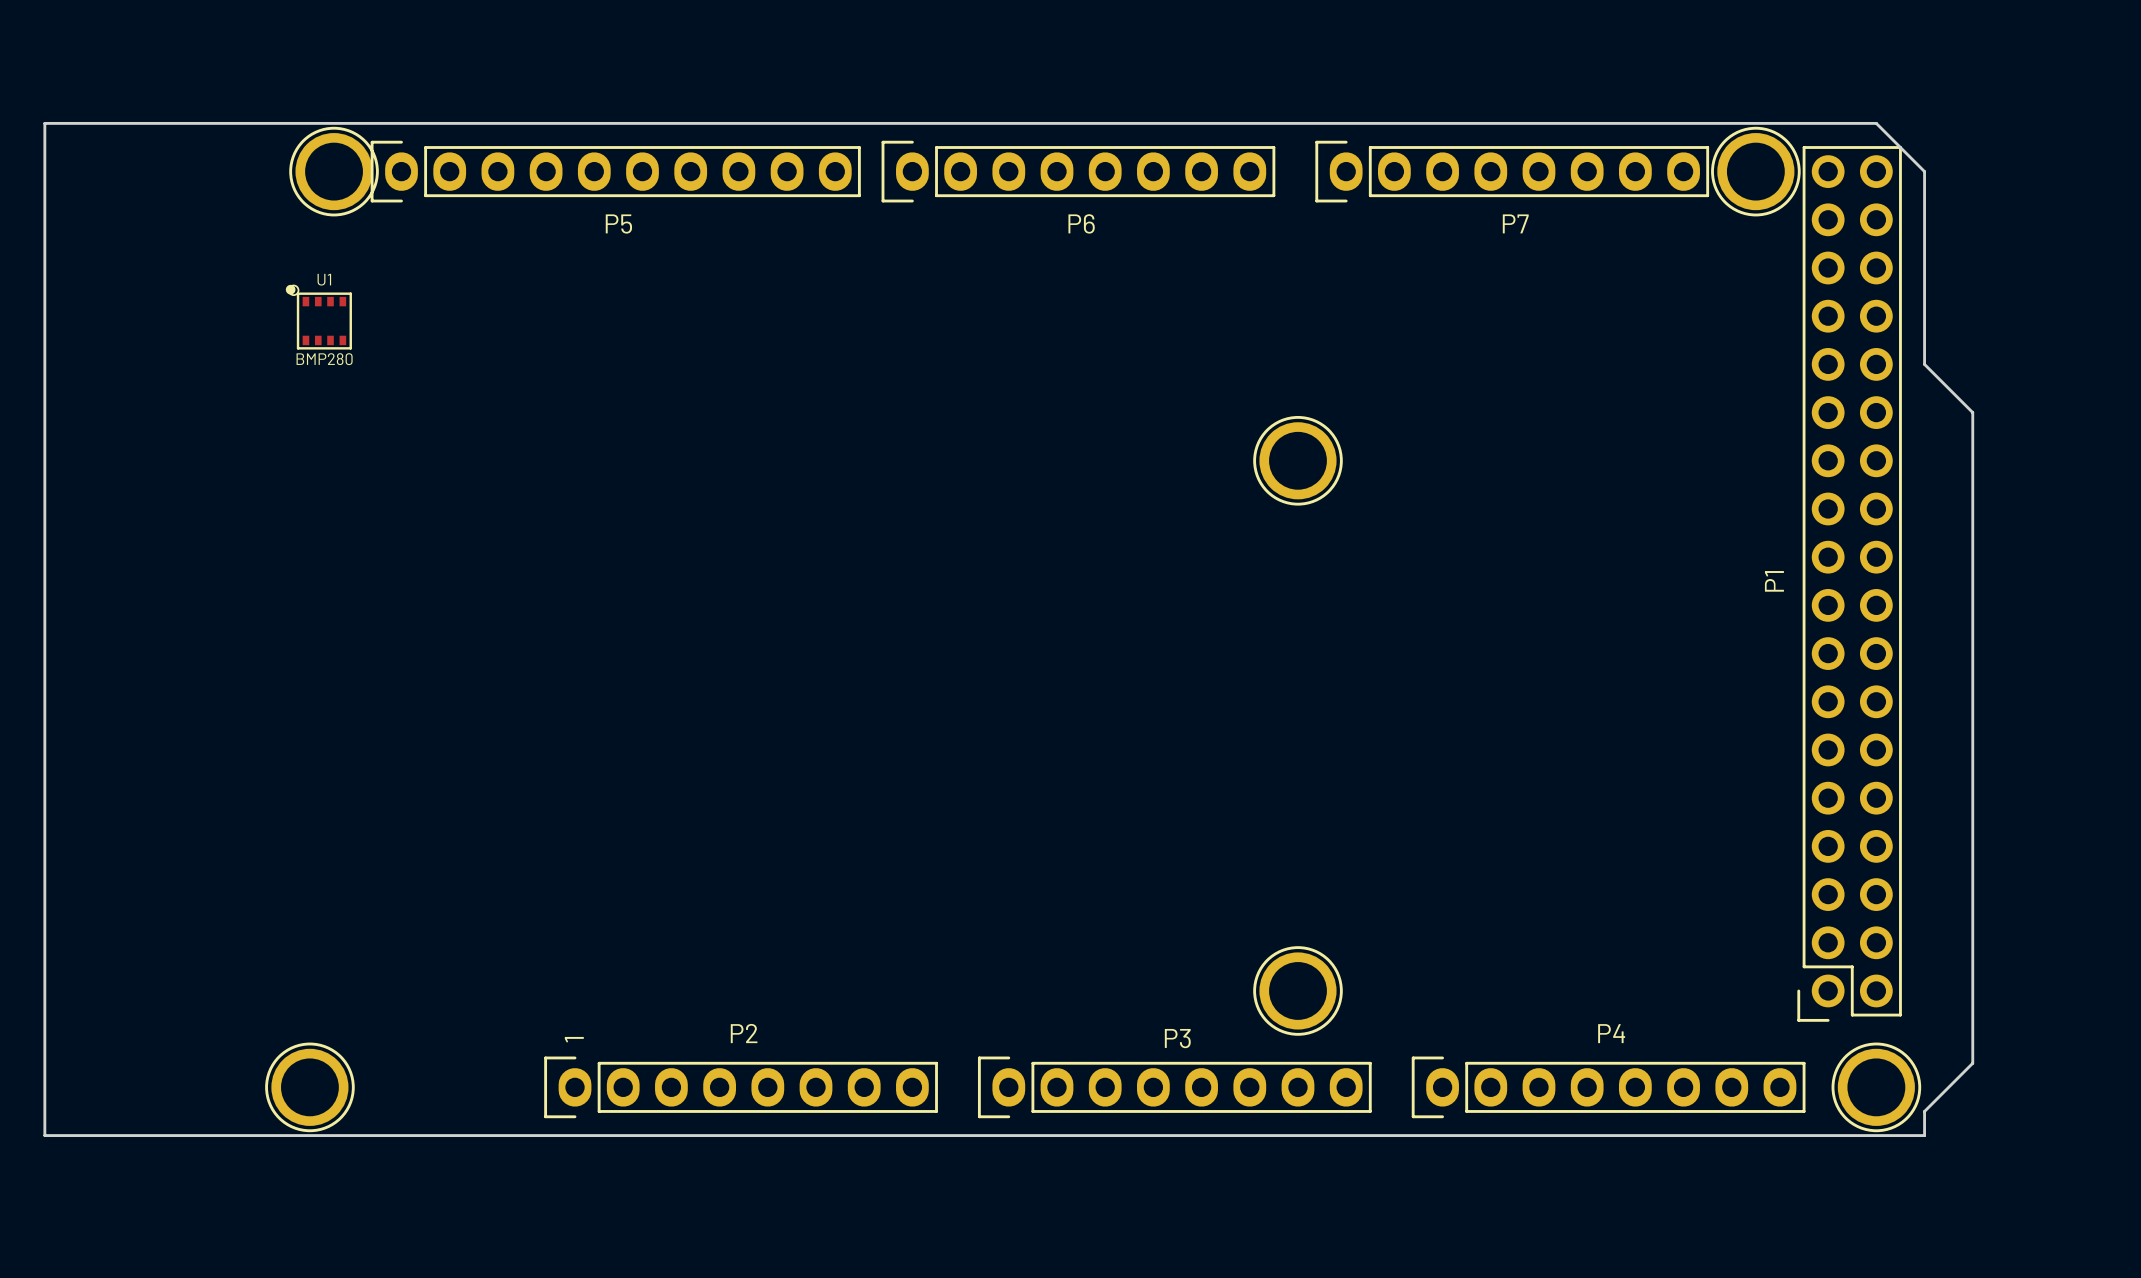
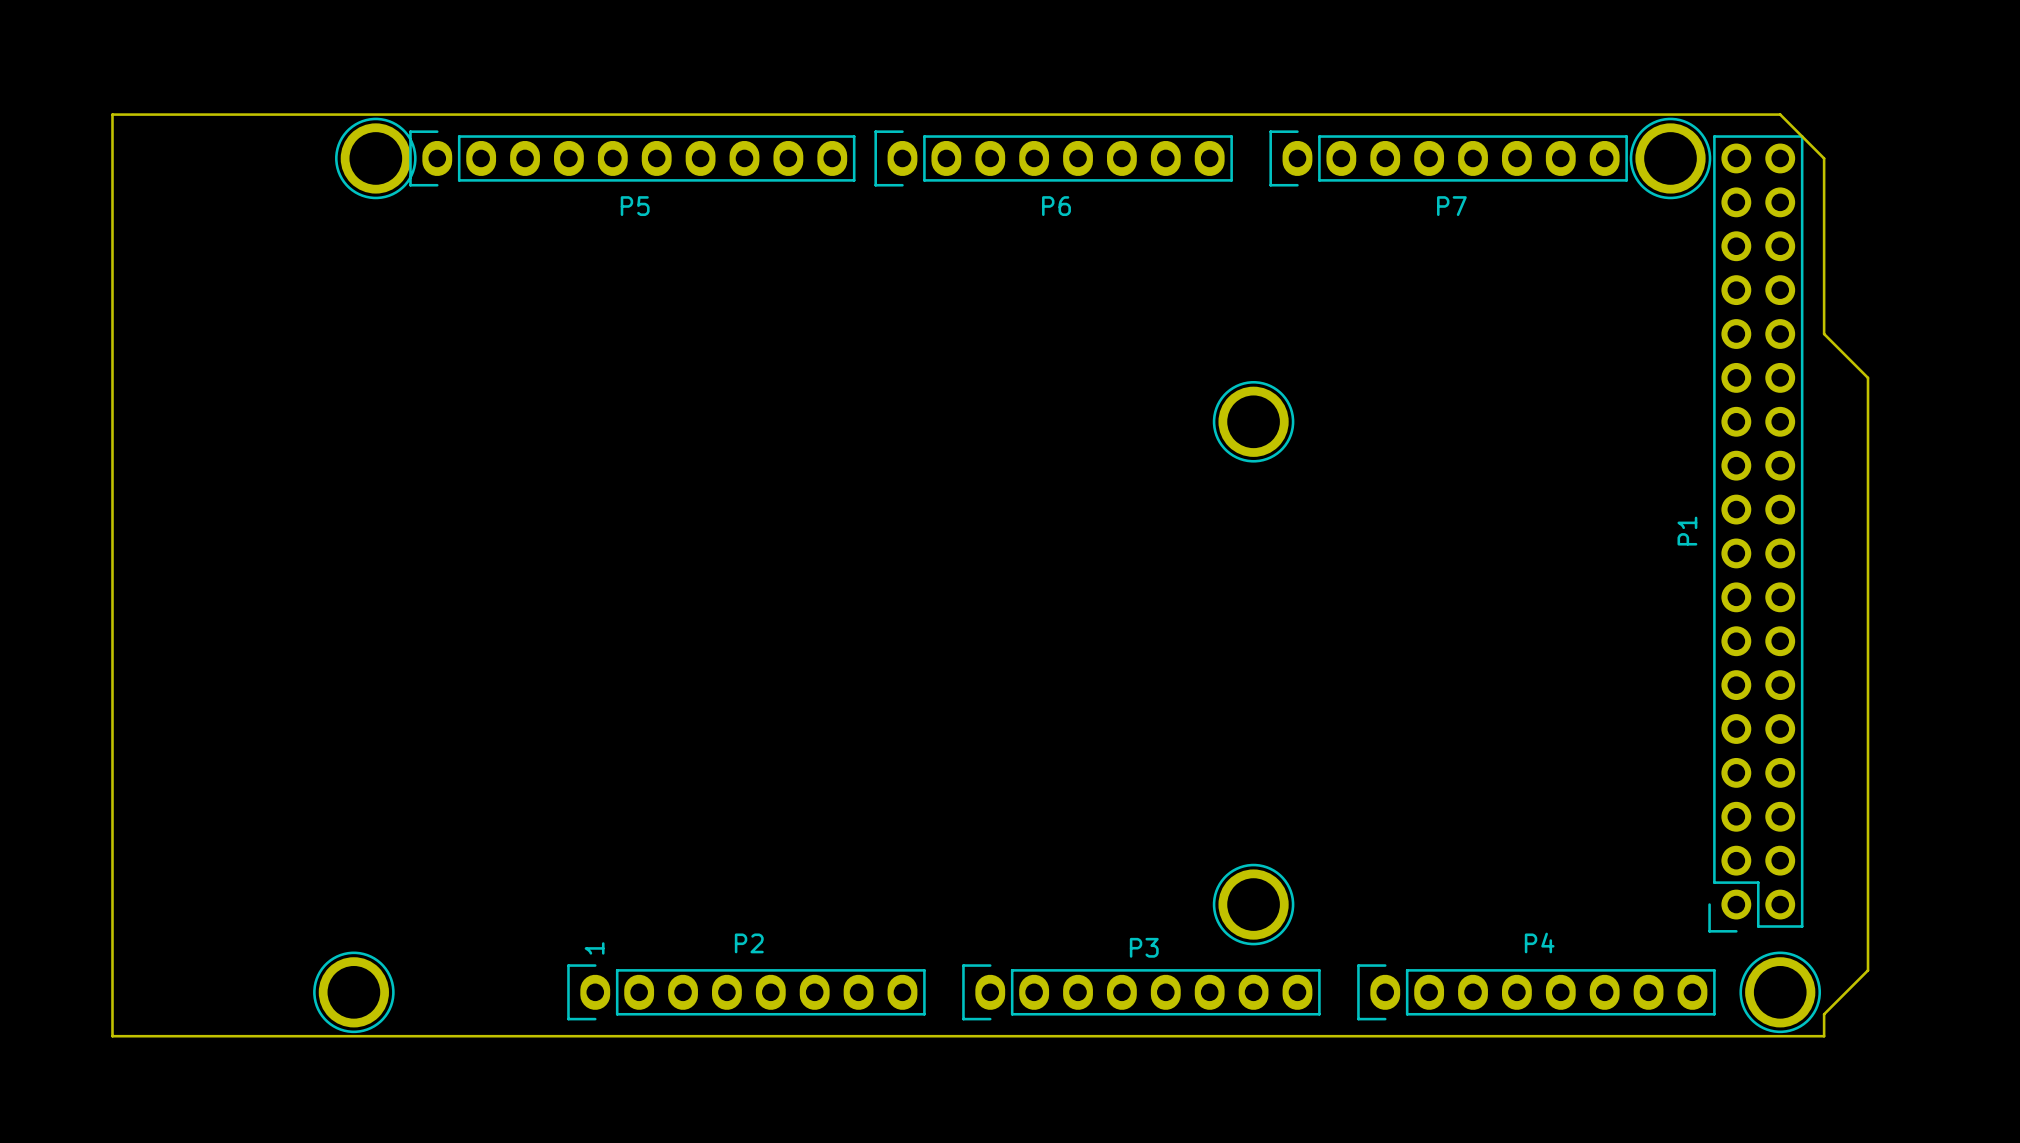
U1: BMP280 (318, 317) -> none

